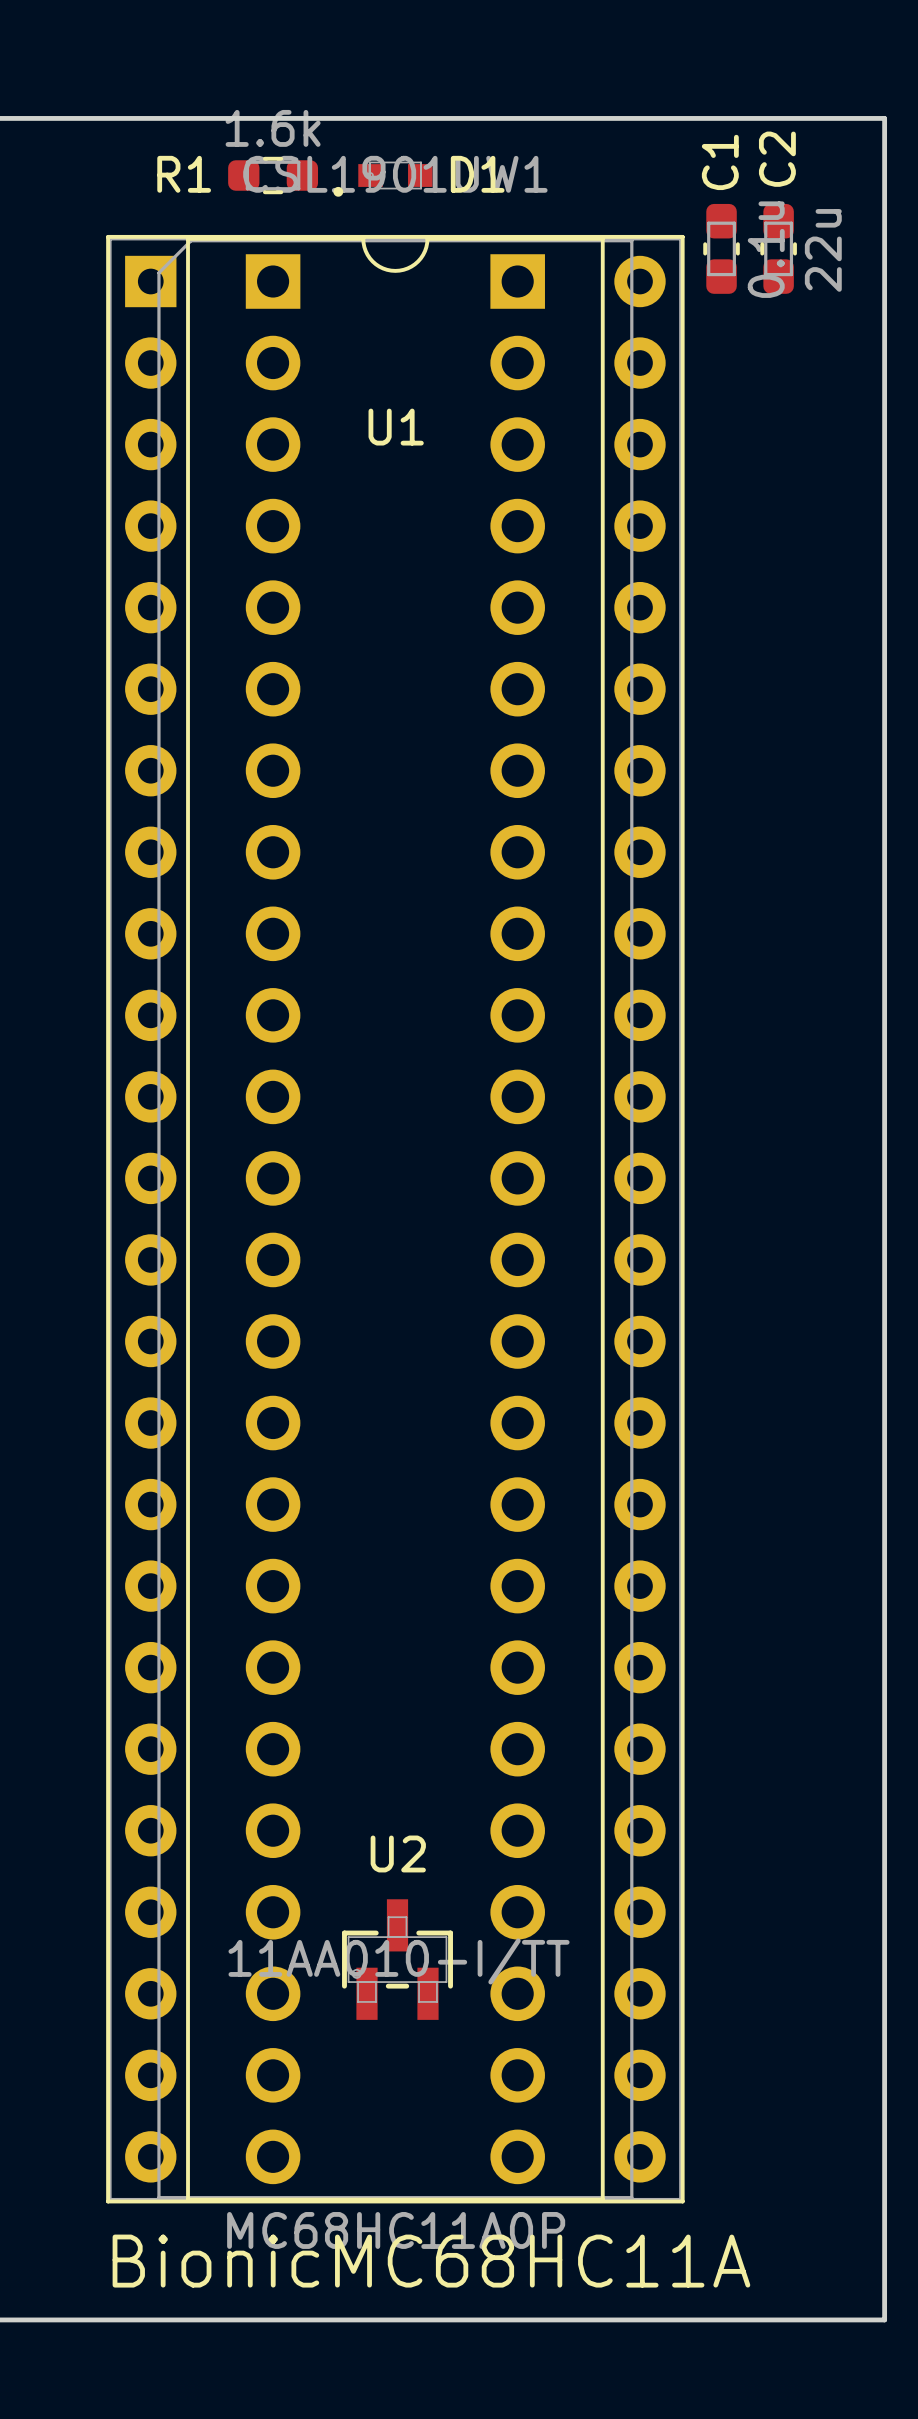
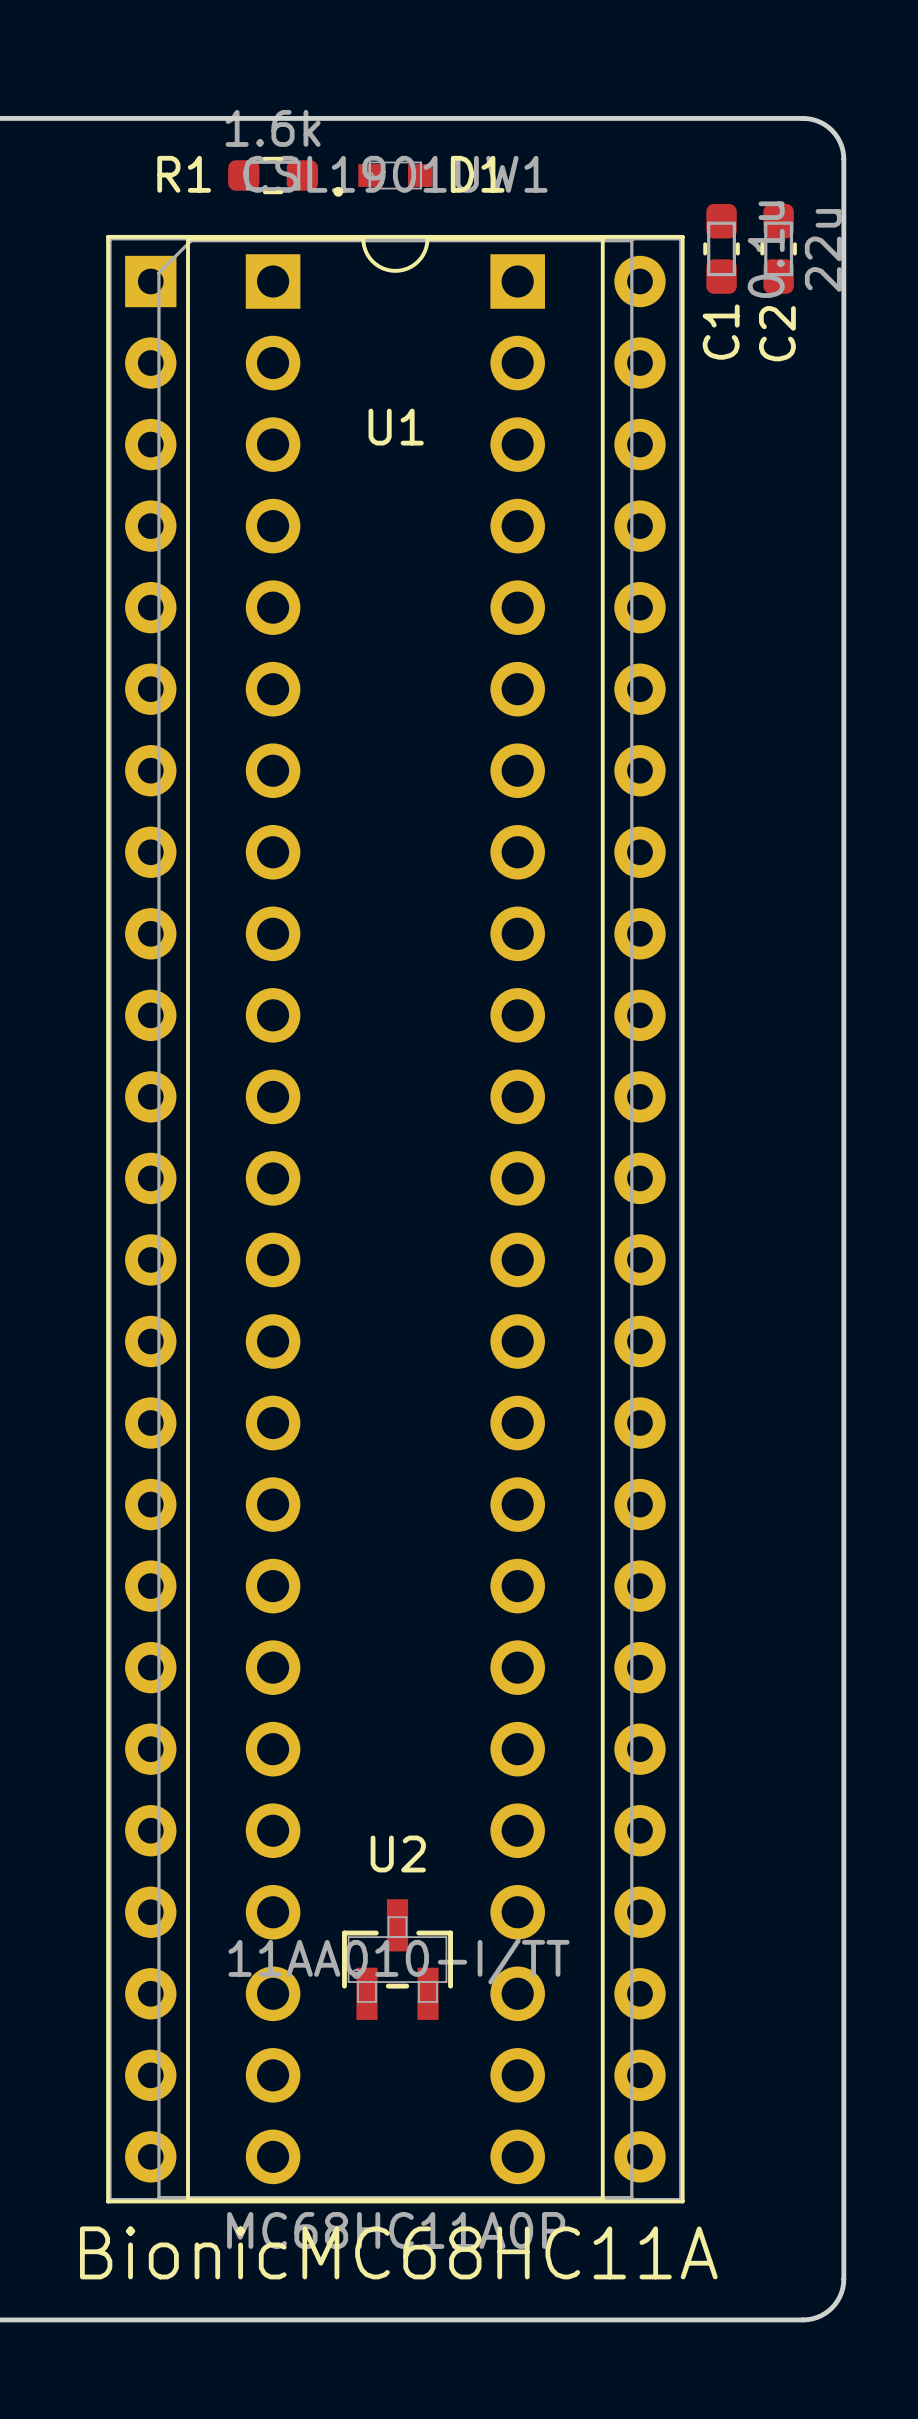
board edge: (803, 118) (884, 118) (884, 2319) (803, 2319) -> (803, 118) (816, 120) (831, 130) (841, 145) (843, 159) (843, 2279) (841, 2292) (831, 2308) (816, 2317) (803, 2319)
C2 name position: C2 (777, 159) -> C2 (777, 333)
C1 name position: C1 (720, 162) -> C1 (721, 332)
text position: BionicMC68HC11A (431, 2261) -> BionicMC68HC11A (398, 2252)

